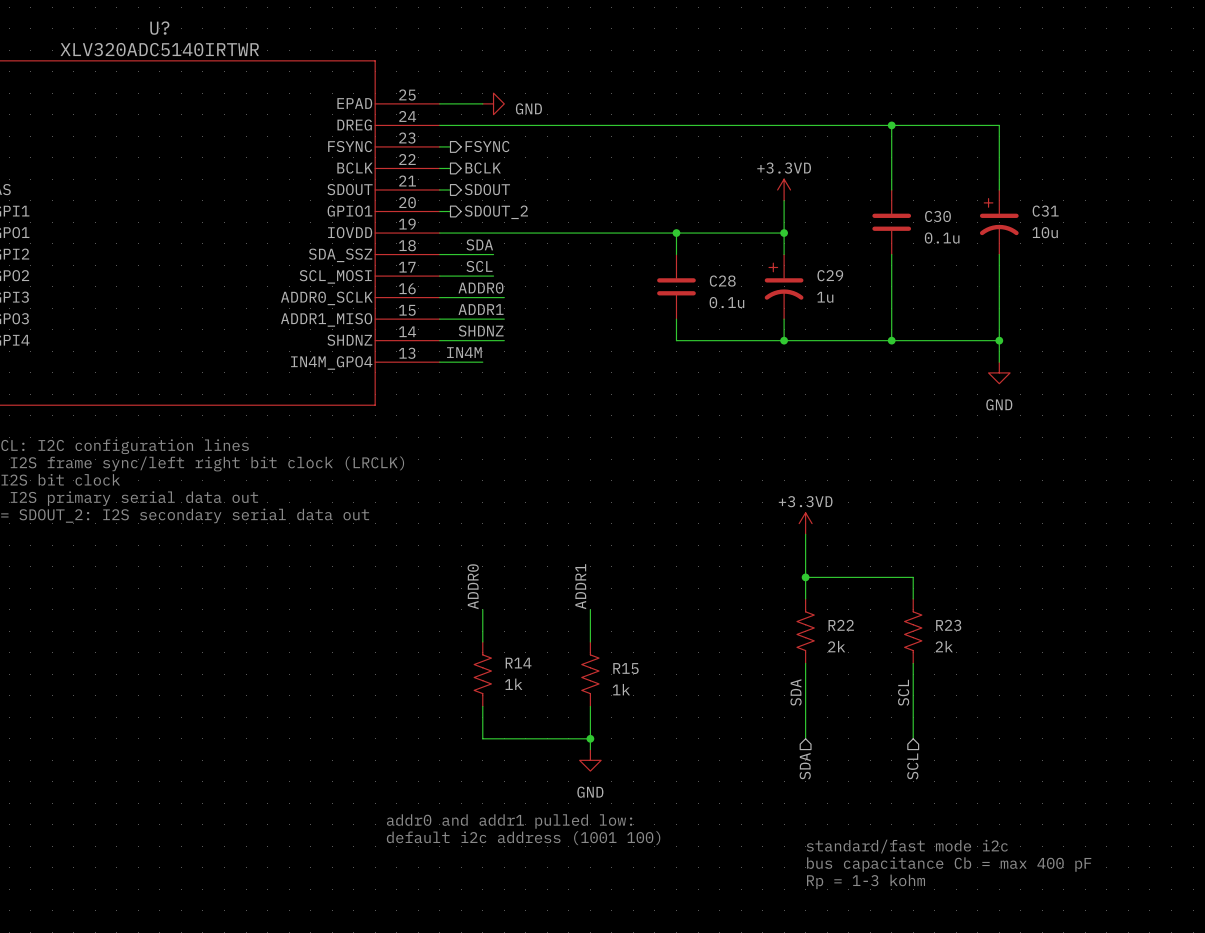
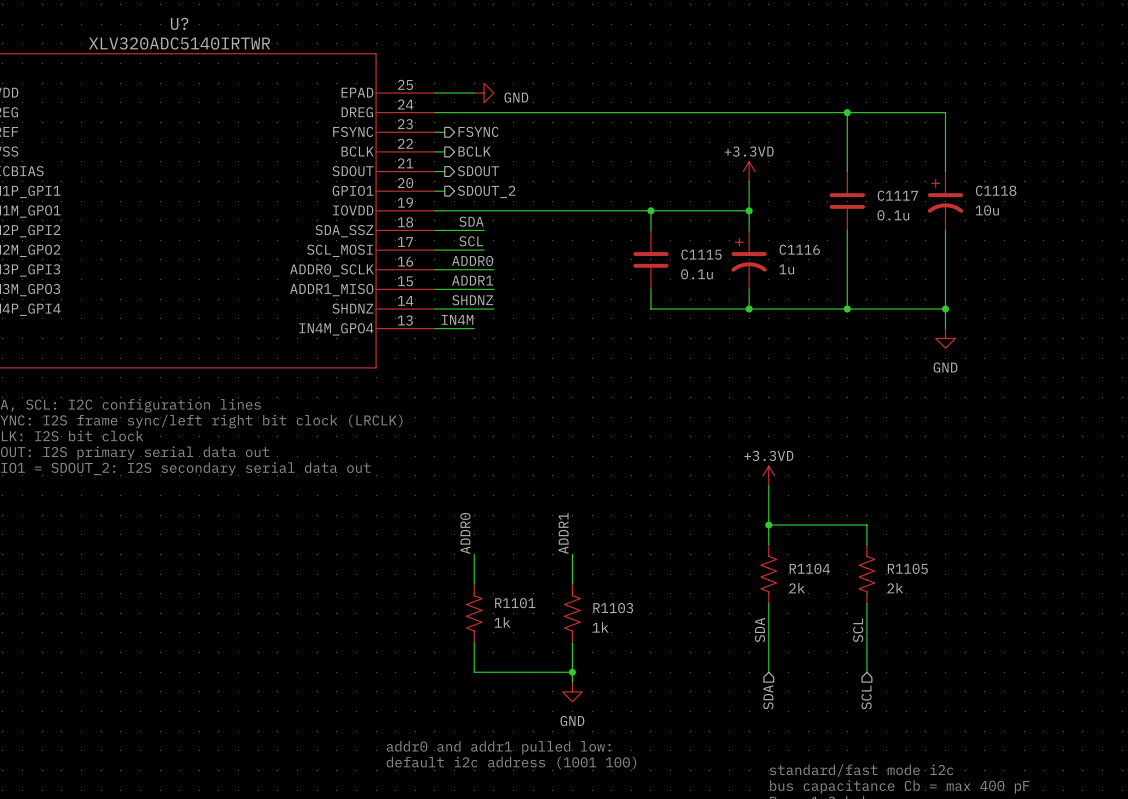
C31 name: C31 (1045, 211) -> C1118 (996, 190)
C30 name: C30 (937, 216) -> C1117 (897, 195)
C29 name: C29 (830, 275) -> C1116 (799, 249)
C28 name: C28 (722, 281) -> C1115 (701, 254)
R22 name: R22 (841, 625) -> R1104 (809, 568)
R23 name: R23 (948, 625) -> R1105 (907, 568)
R14 name: R14 (518, 663) -> R1101 (515, 603)
R15 name: R15 (625, 668) -> R1103 (613, 608)

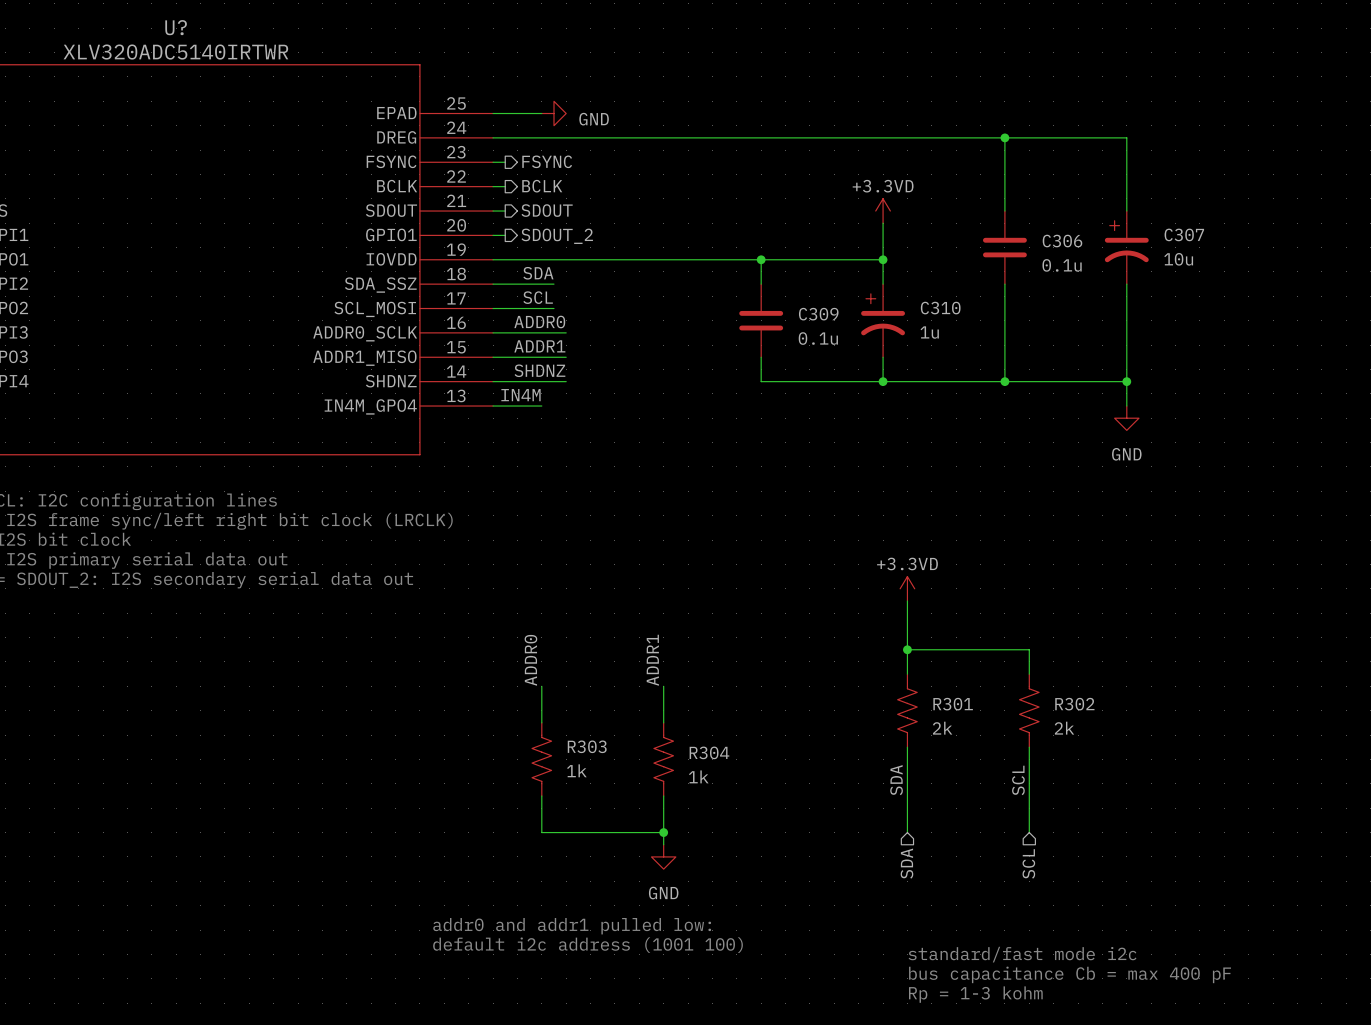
C1118 name: C1118 (996, 190) -> C307 (1184, 234)
C1117 name: C1117 (897, 195) -> C306 (1062, 241)
C1116 name: C1116 (799, 249) -> C310 (940, 308)
C1115 name: C1115 (701, 254) -> C309 (818, 314)
R1104 name: R1104 (809, 568) -> R301 (953, 704)
R1105 name: R1105 (907, 568) -> R302 (1074, 704)
R1101 name: R1101 (515, 603) -> R303 (587, 746)
R1103 name: R1103 (613, 608) -> R304 (709, 752)

